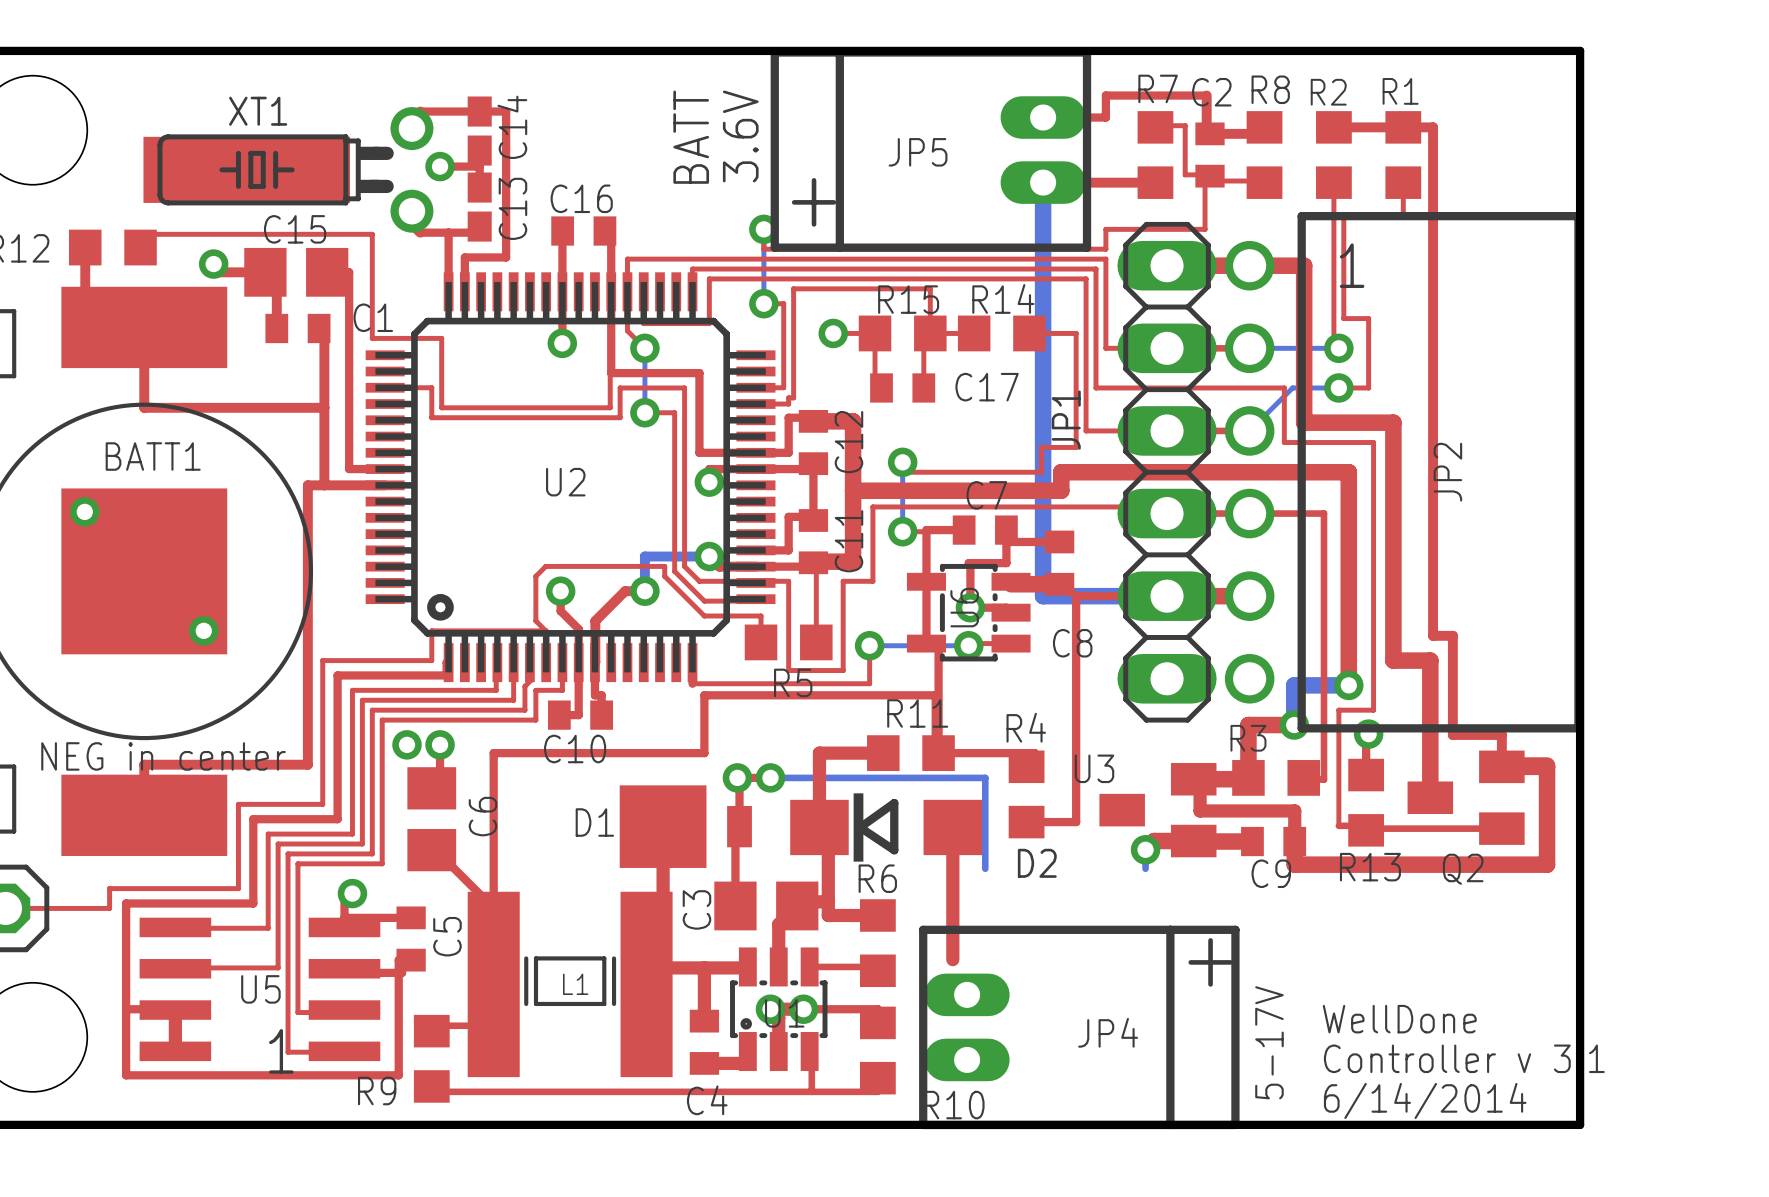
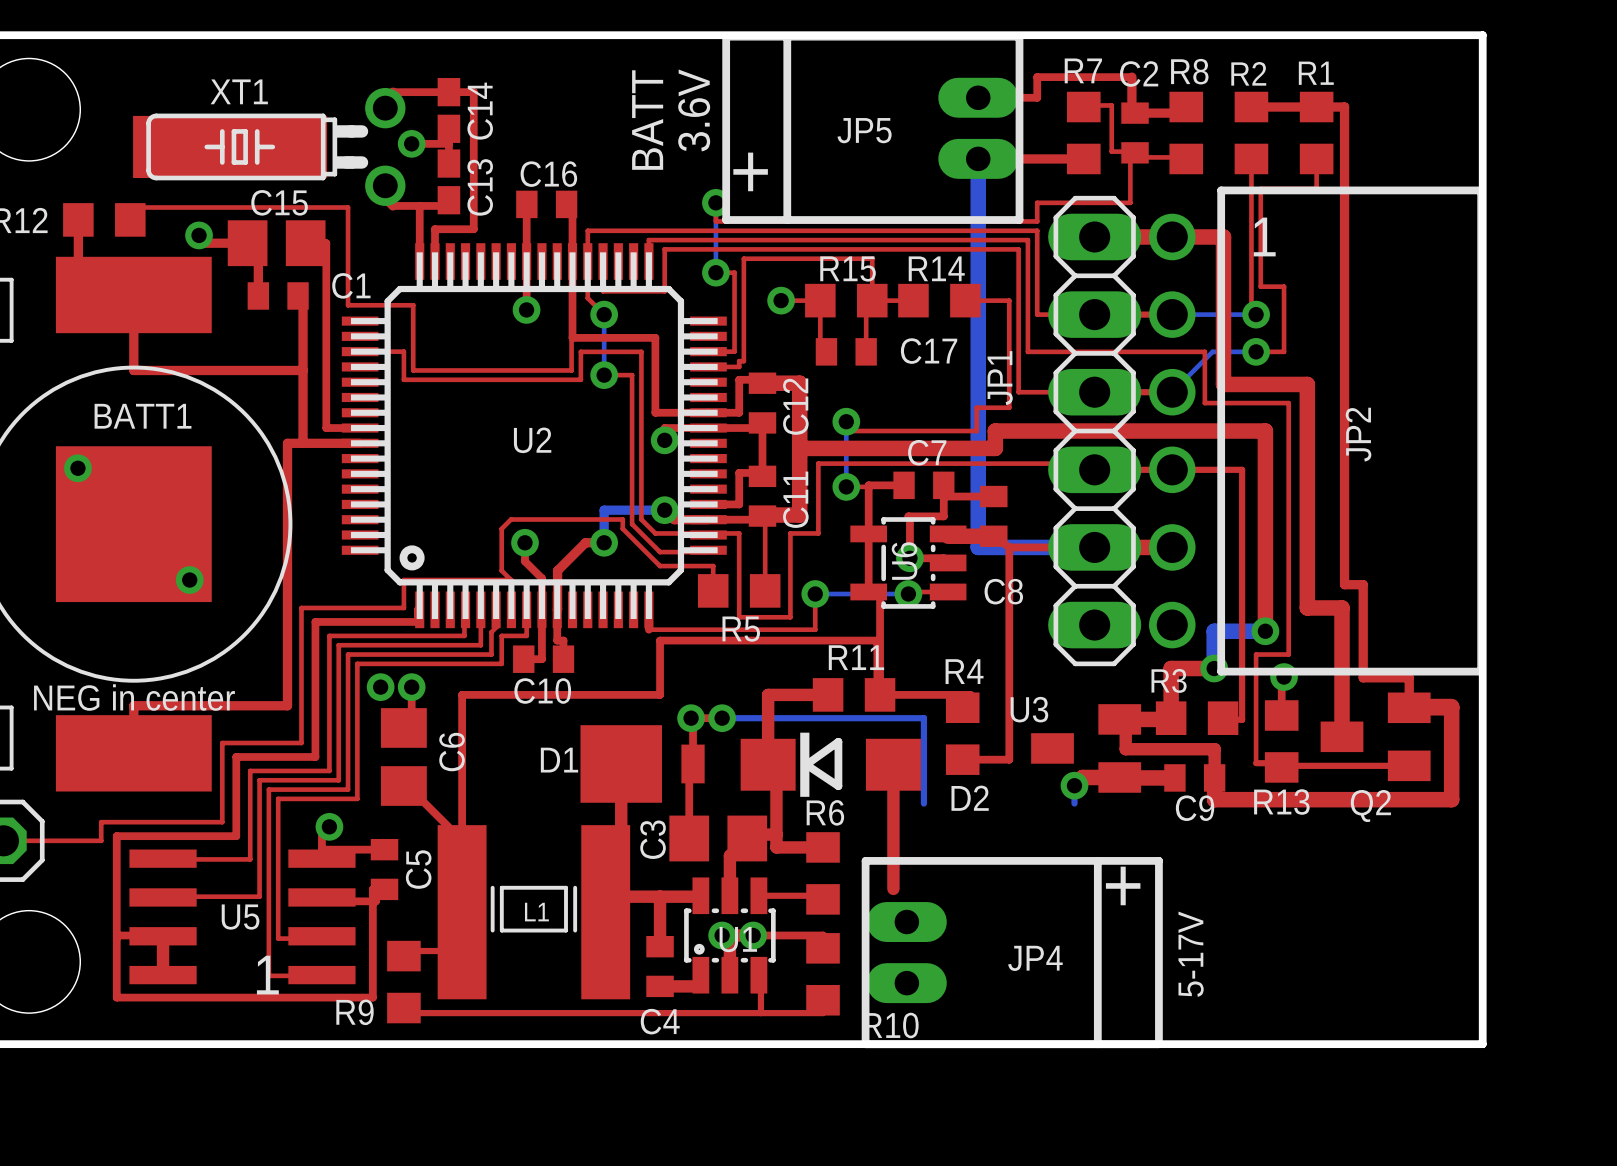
text: WellDone (1399, 1019) -> none
text: Controller v 3.1 (1464, 1058) -> none
text: 6/14/2014 (1425, 1100) -> none

